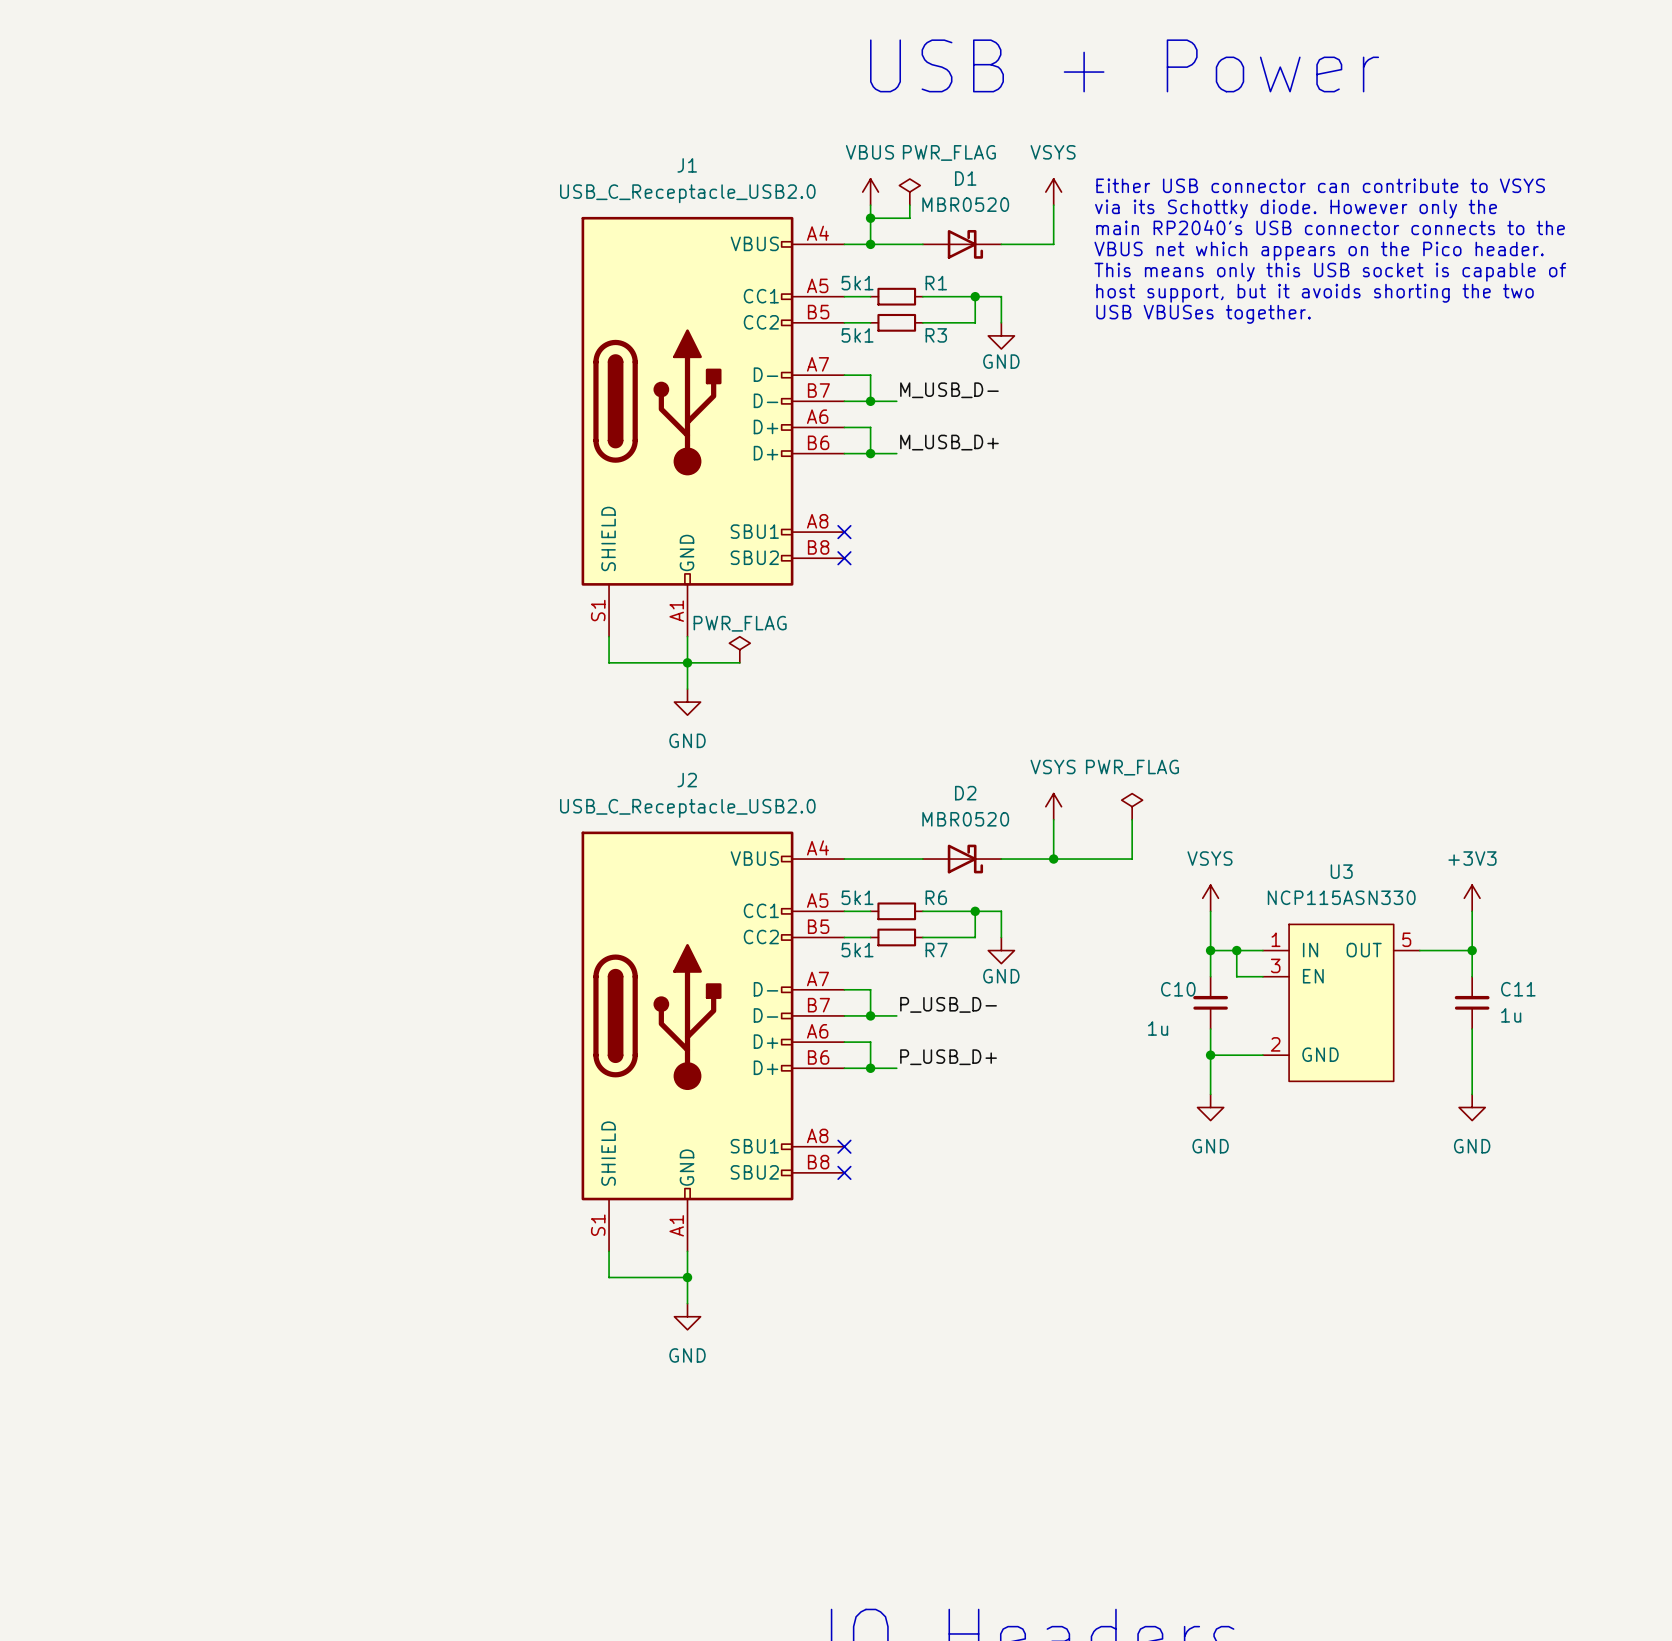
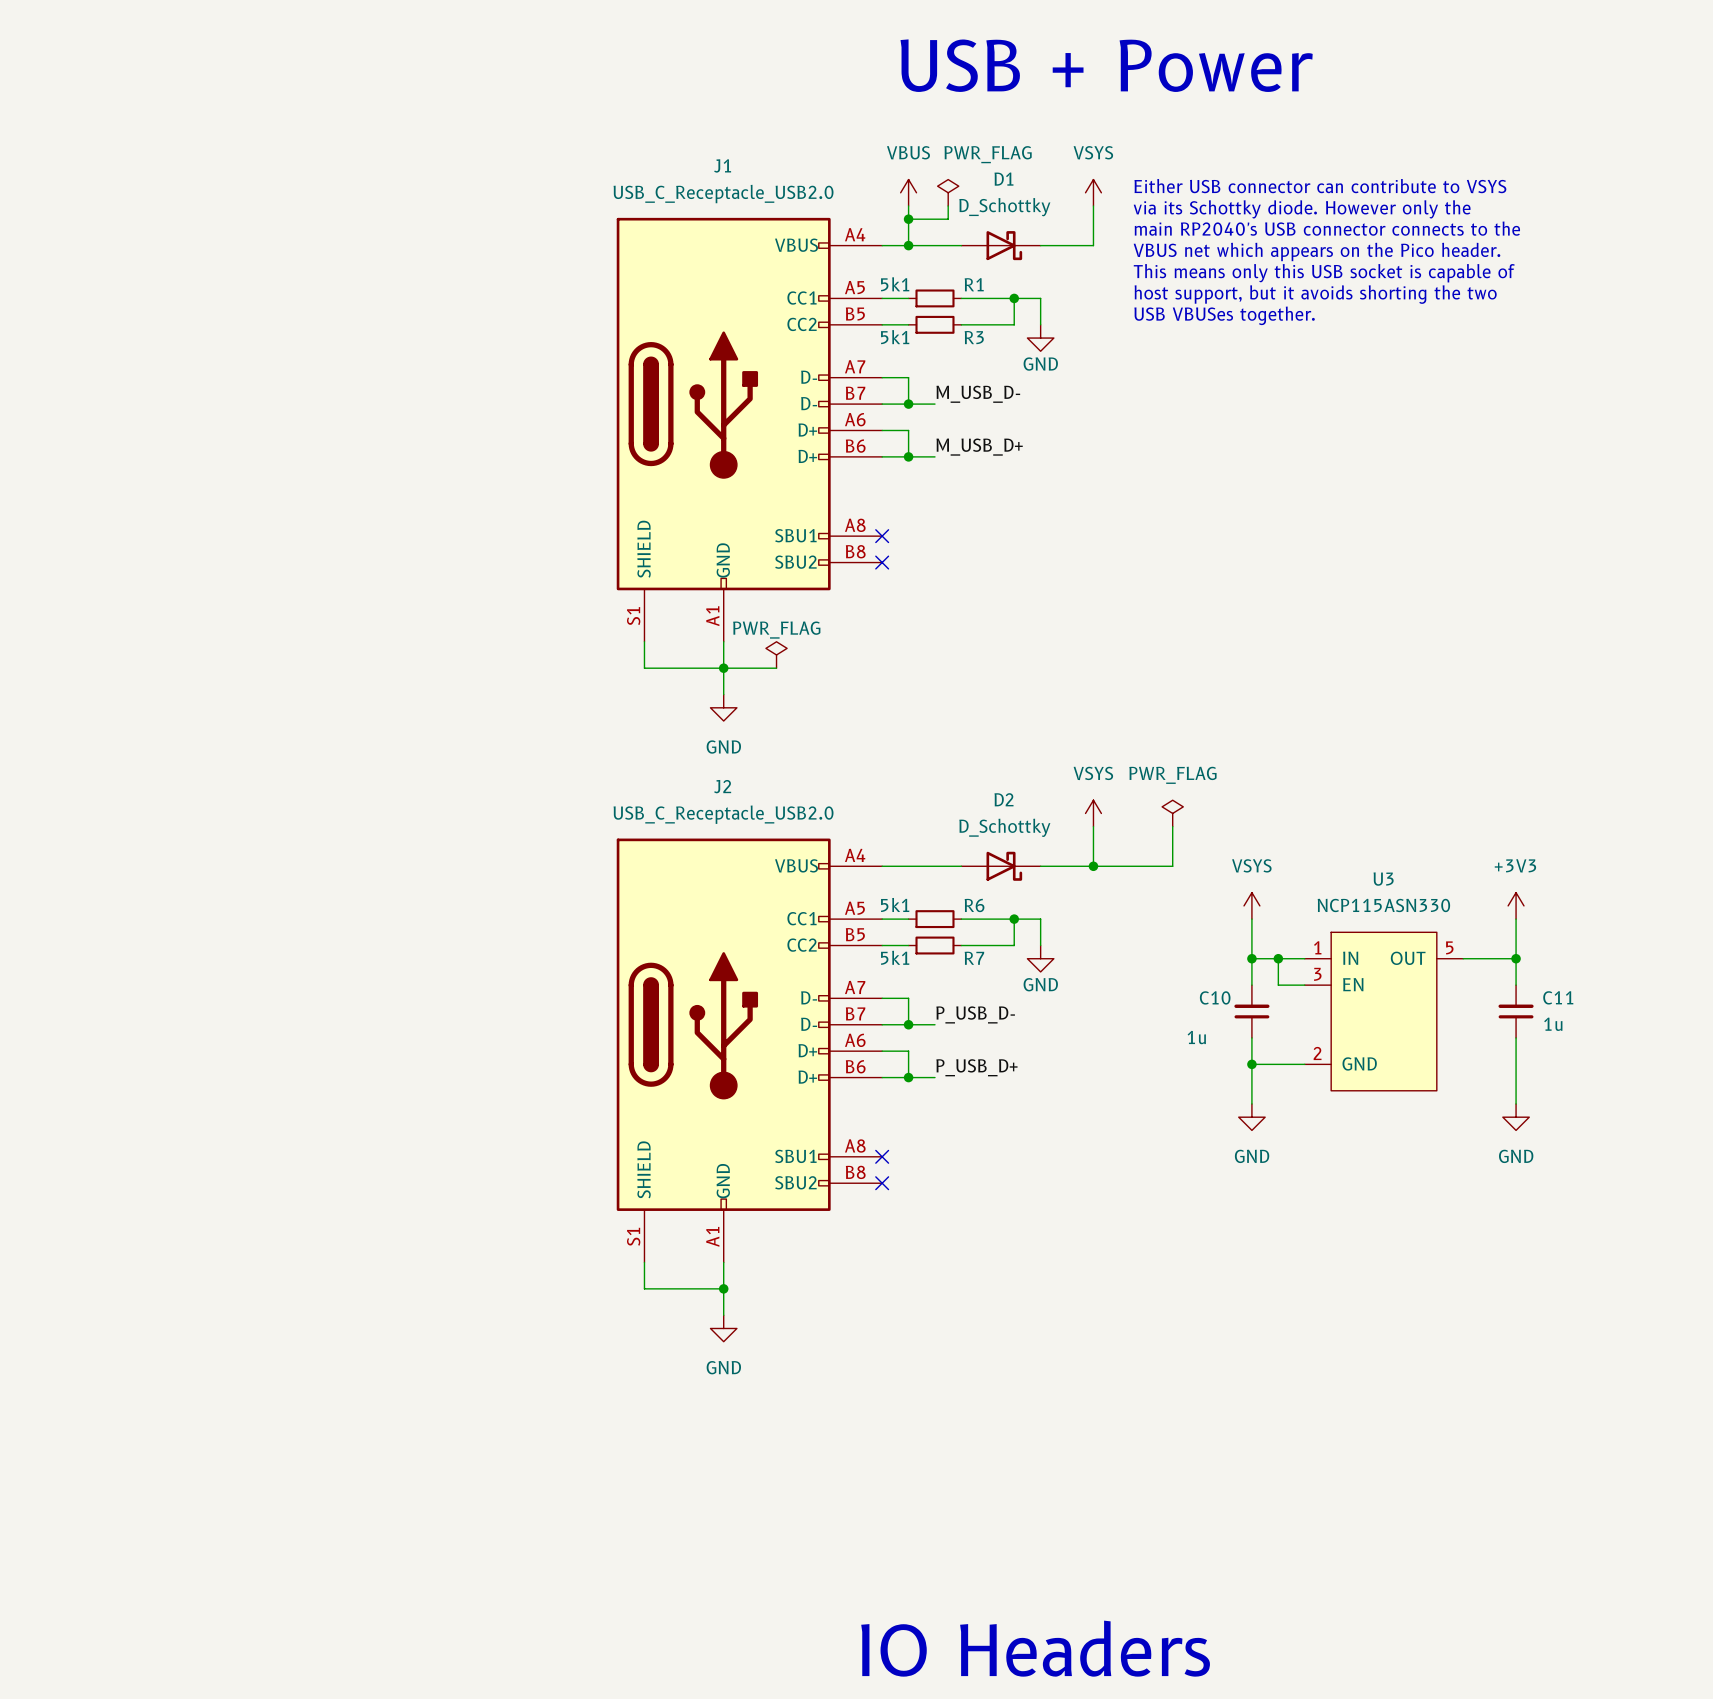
D1 value: MBR0520 (965, 204) -> D_Schottky (1004, 207)
D2 value: MBR0520 (965, 819) -> D_Schottky (1004, 827)

